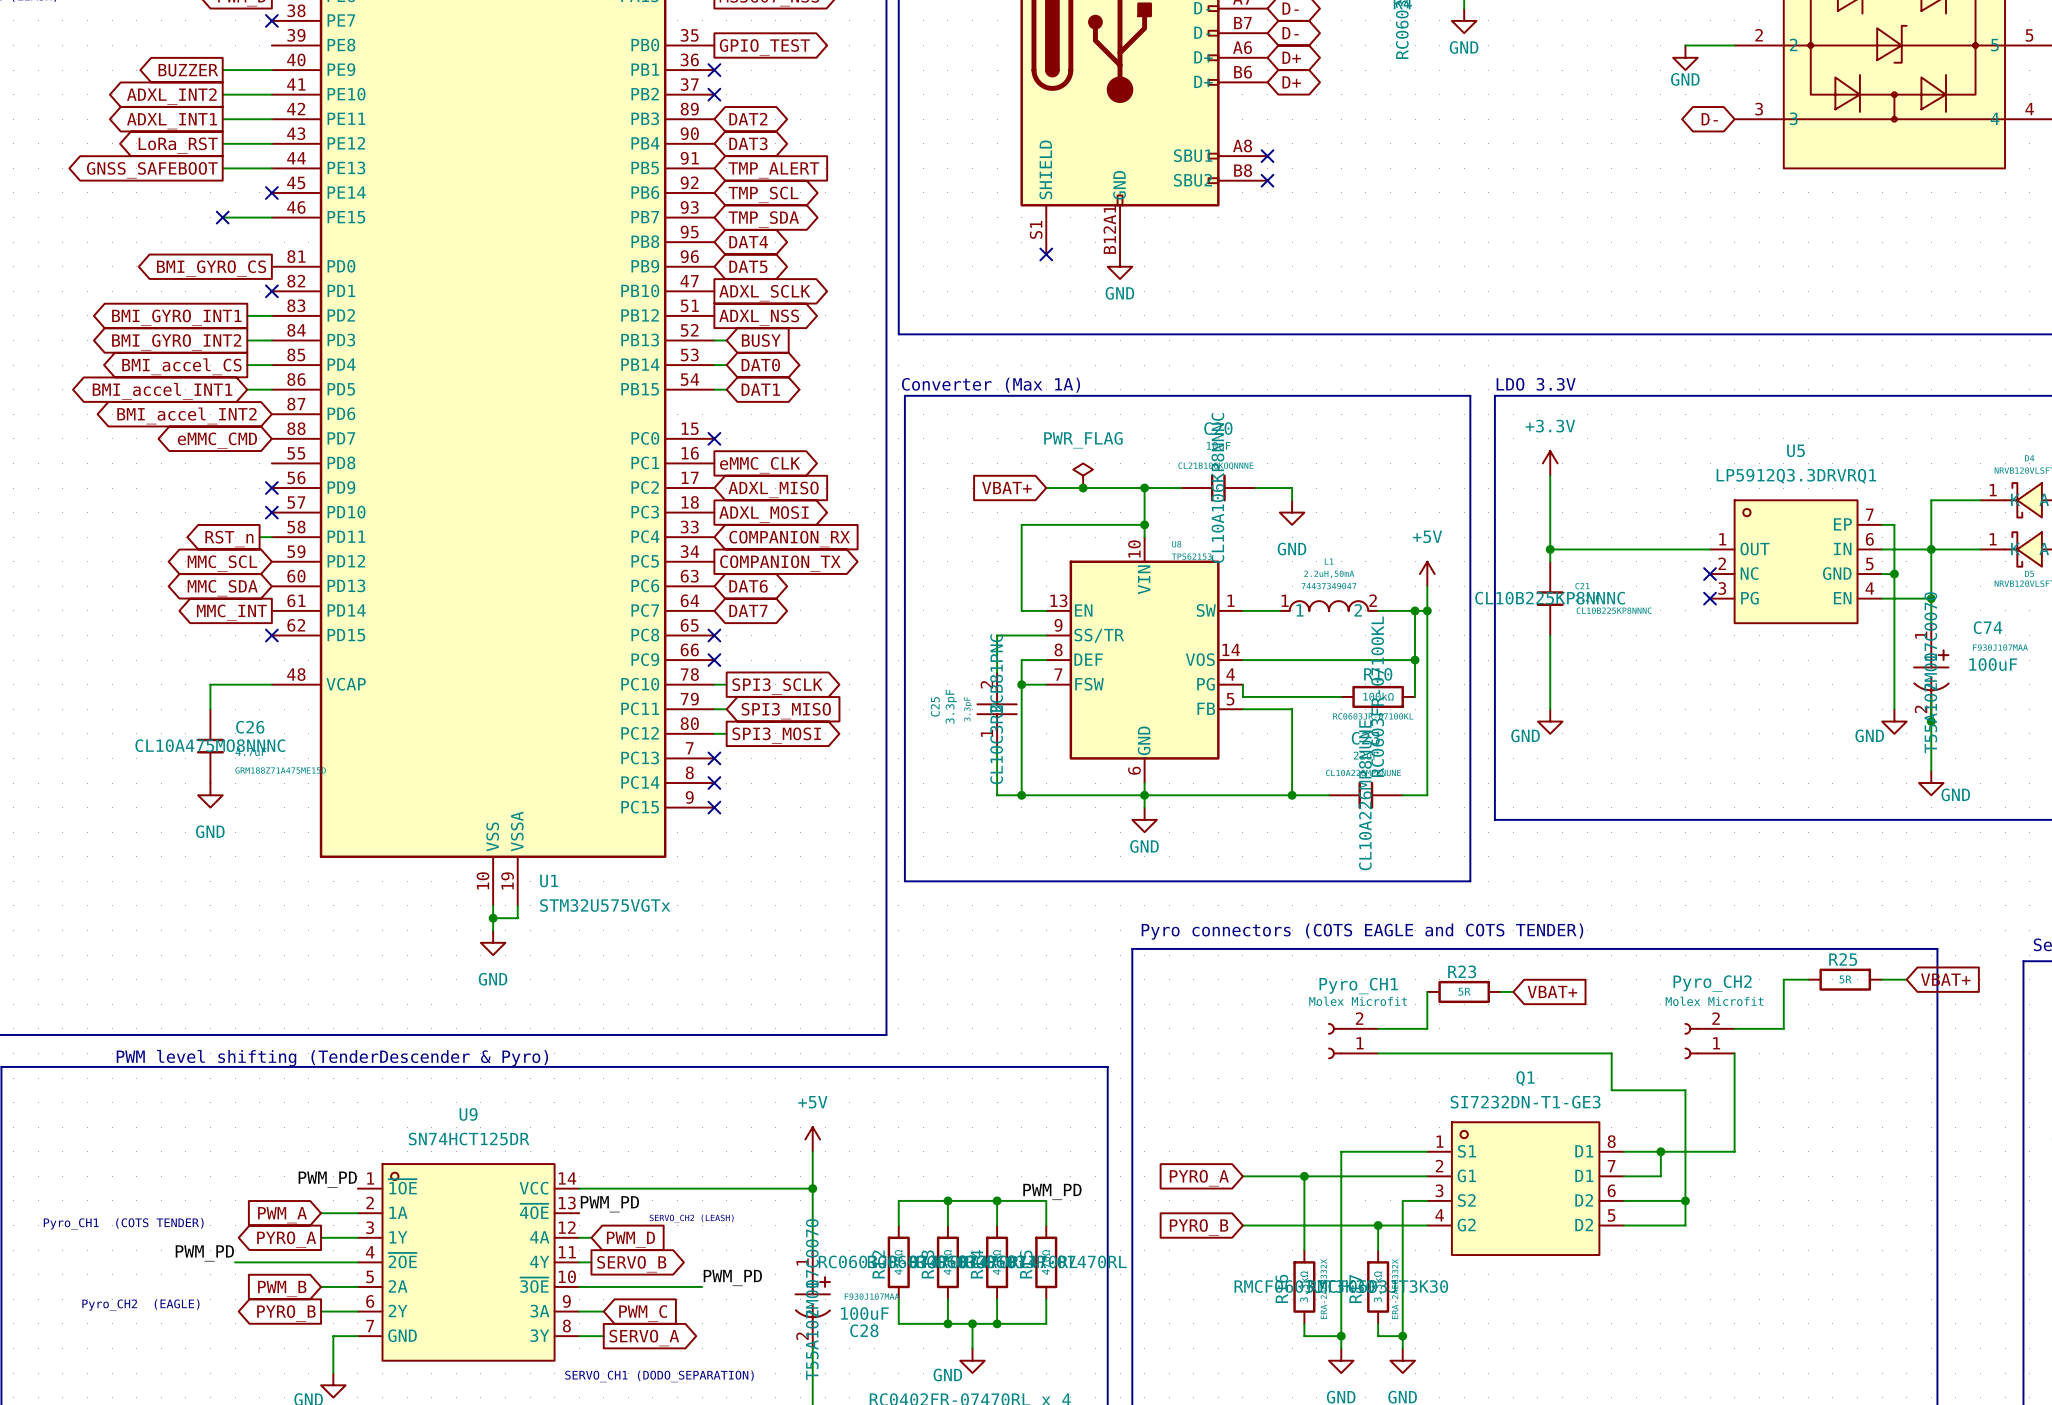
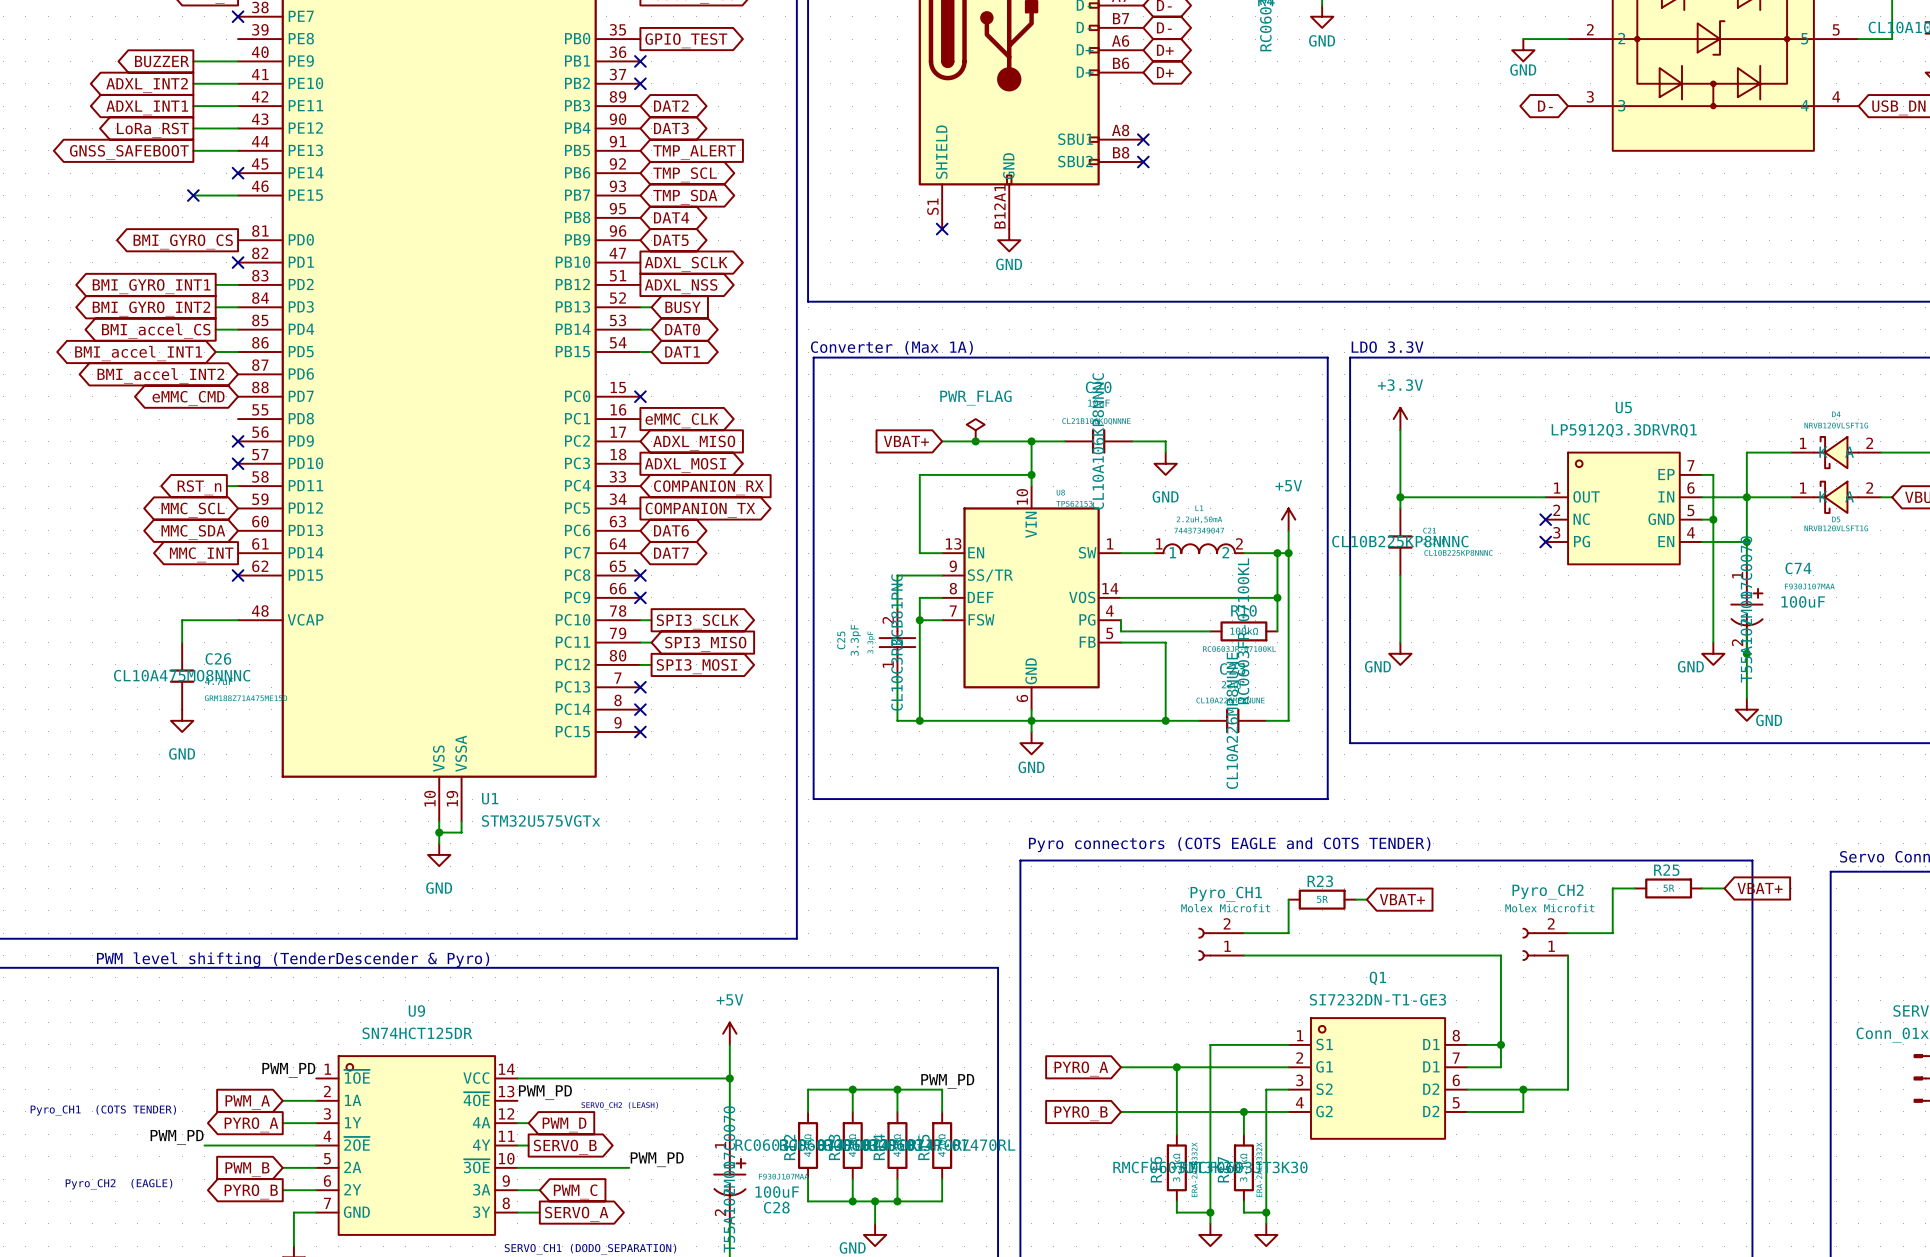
wire: (1611, 1053) (1611, 1090) (1685, 1090) (1685, 1200) -> (1456, 955) (1500, 955) (1500, 1044)
wire: (1660, 1151) (1734, 1151) -> (1523, 1089) (1568, 1089) (1568, 1044)

